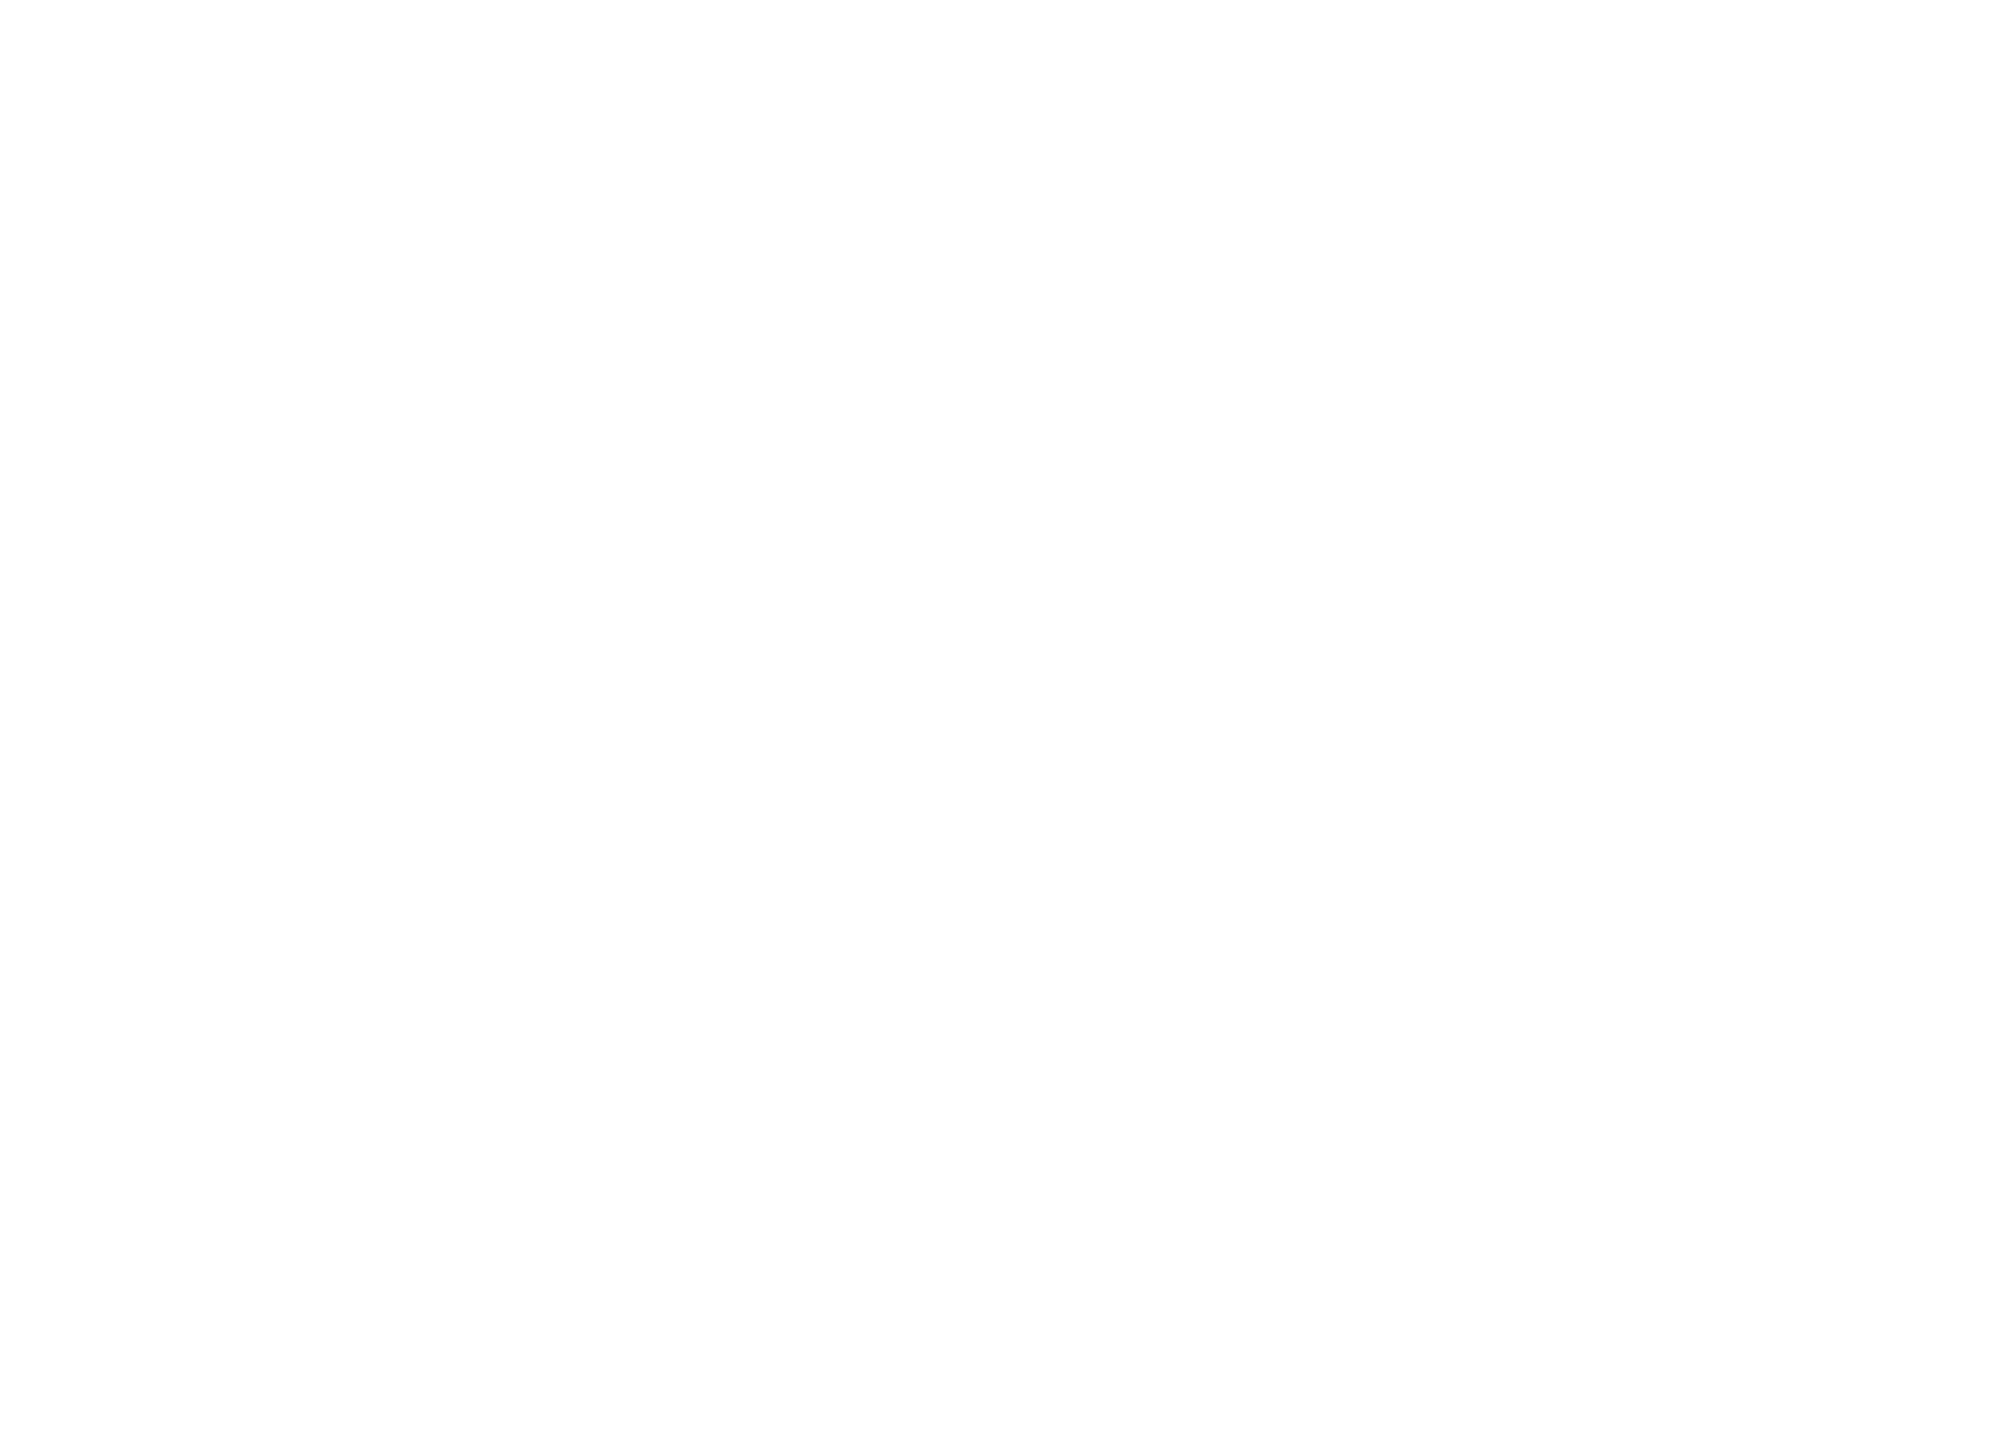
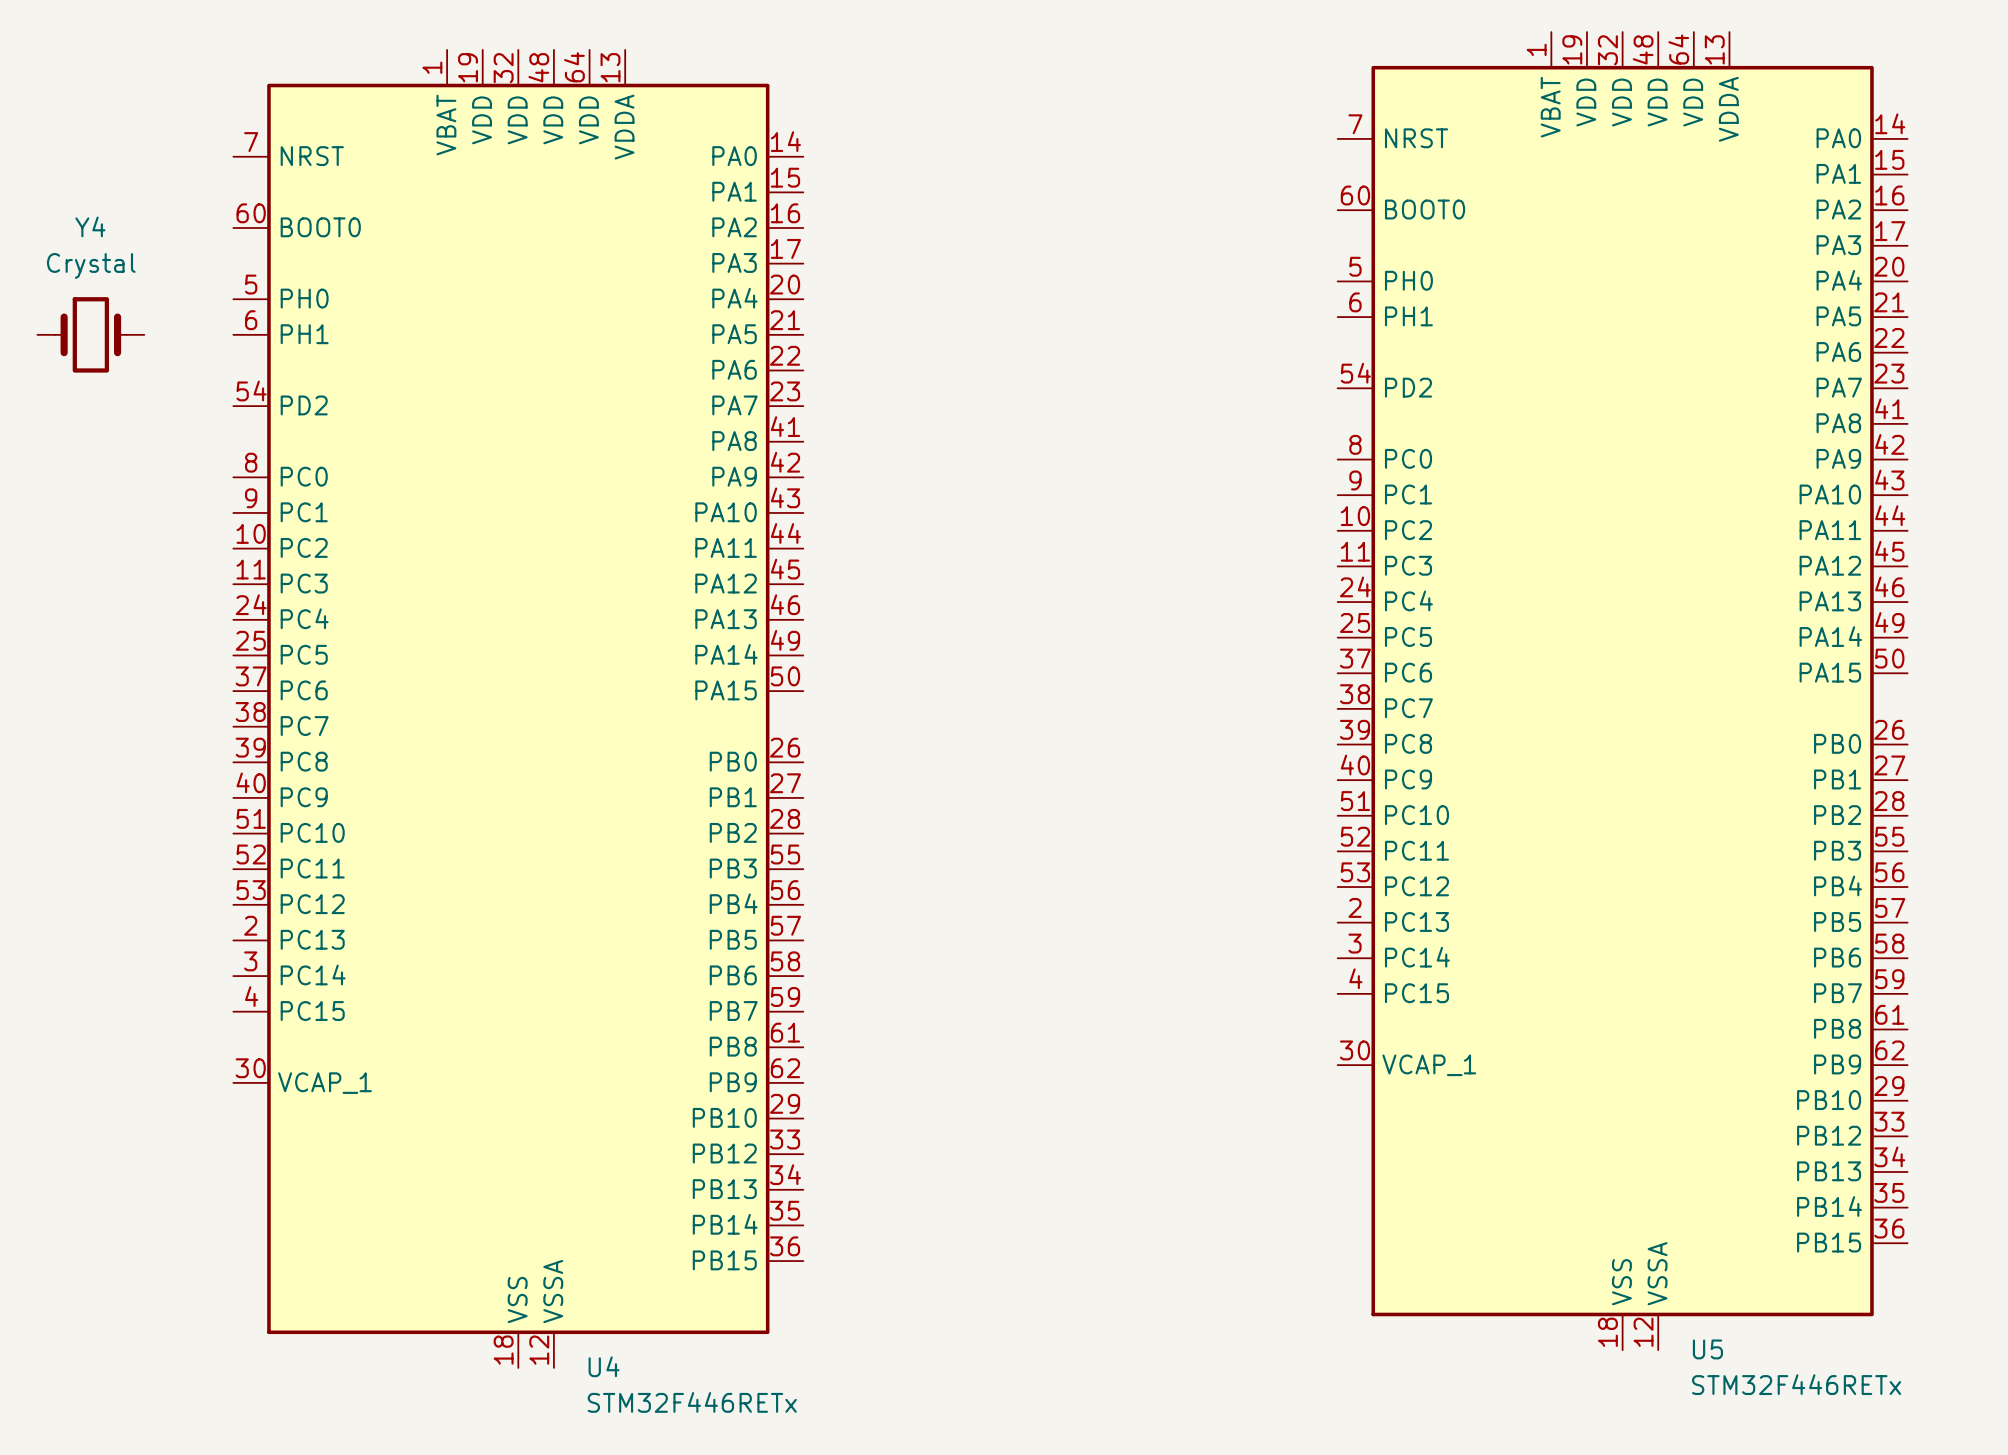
Y4: none -> Crystal (90, 334)
U5: none -> STM32F446RETx (1622, 691)
U4: none -> STM32F446RETx (518, 708)

